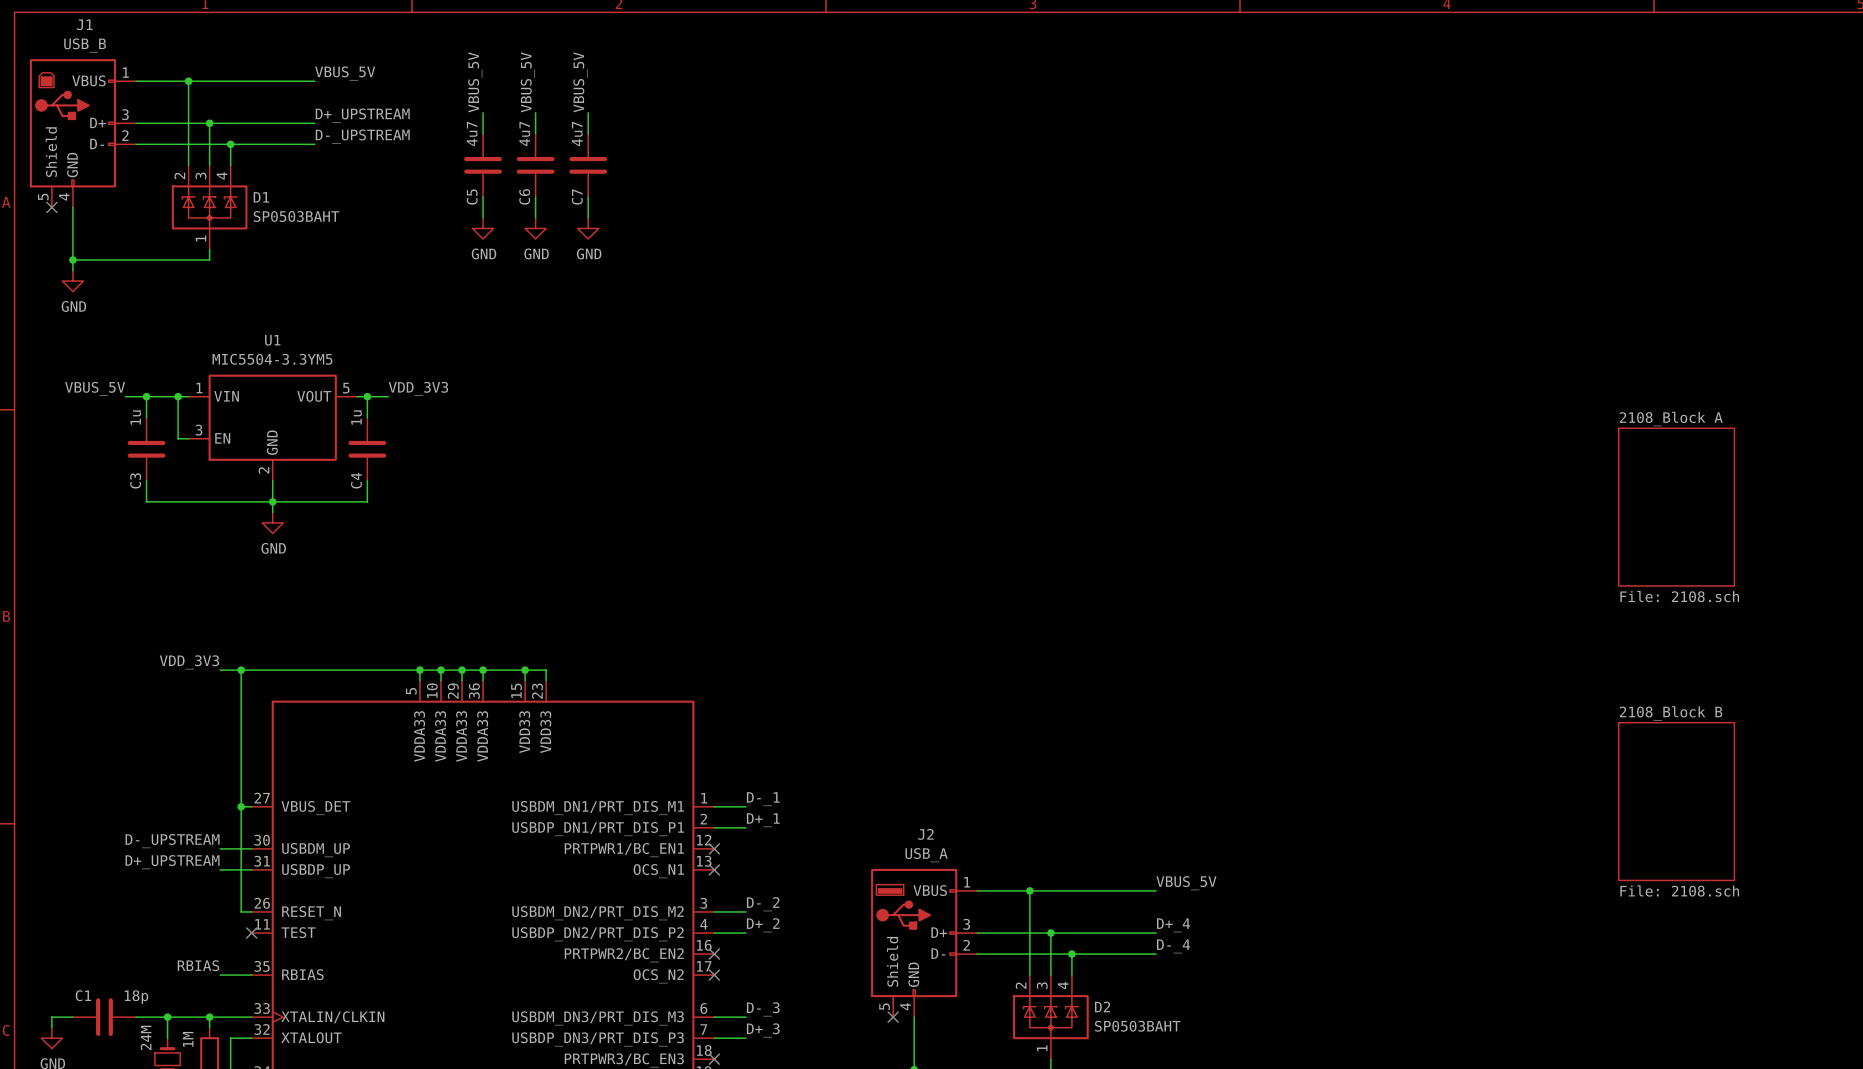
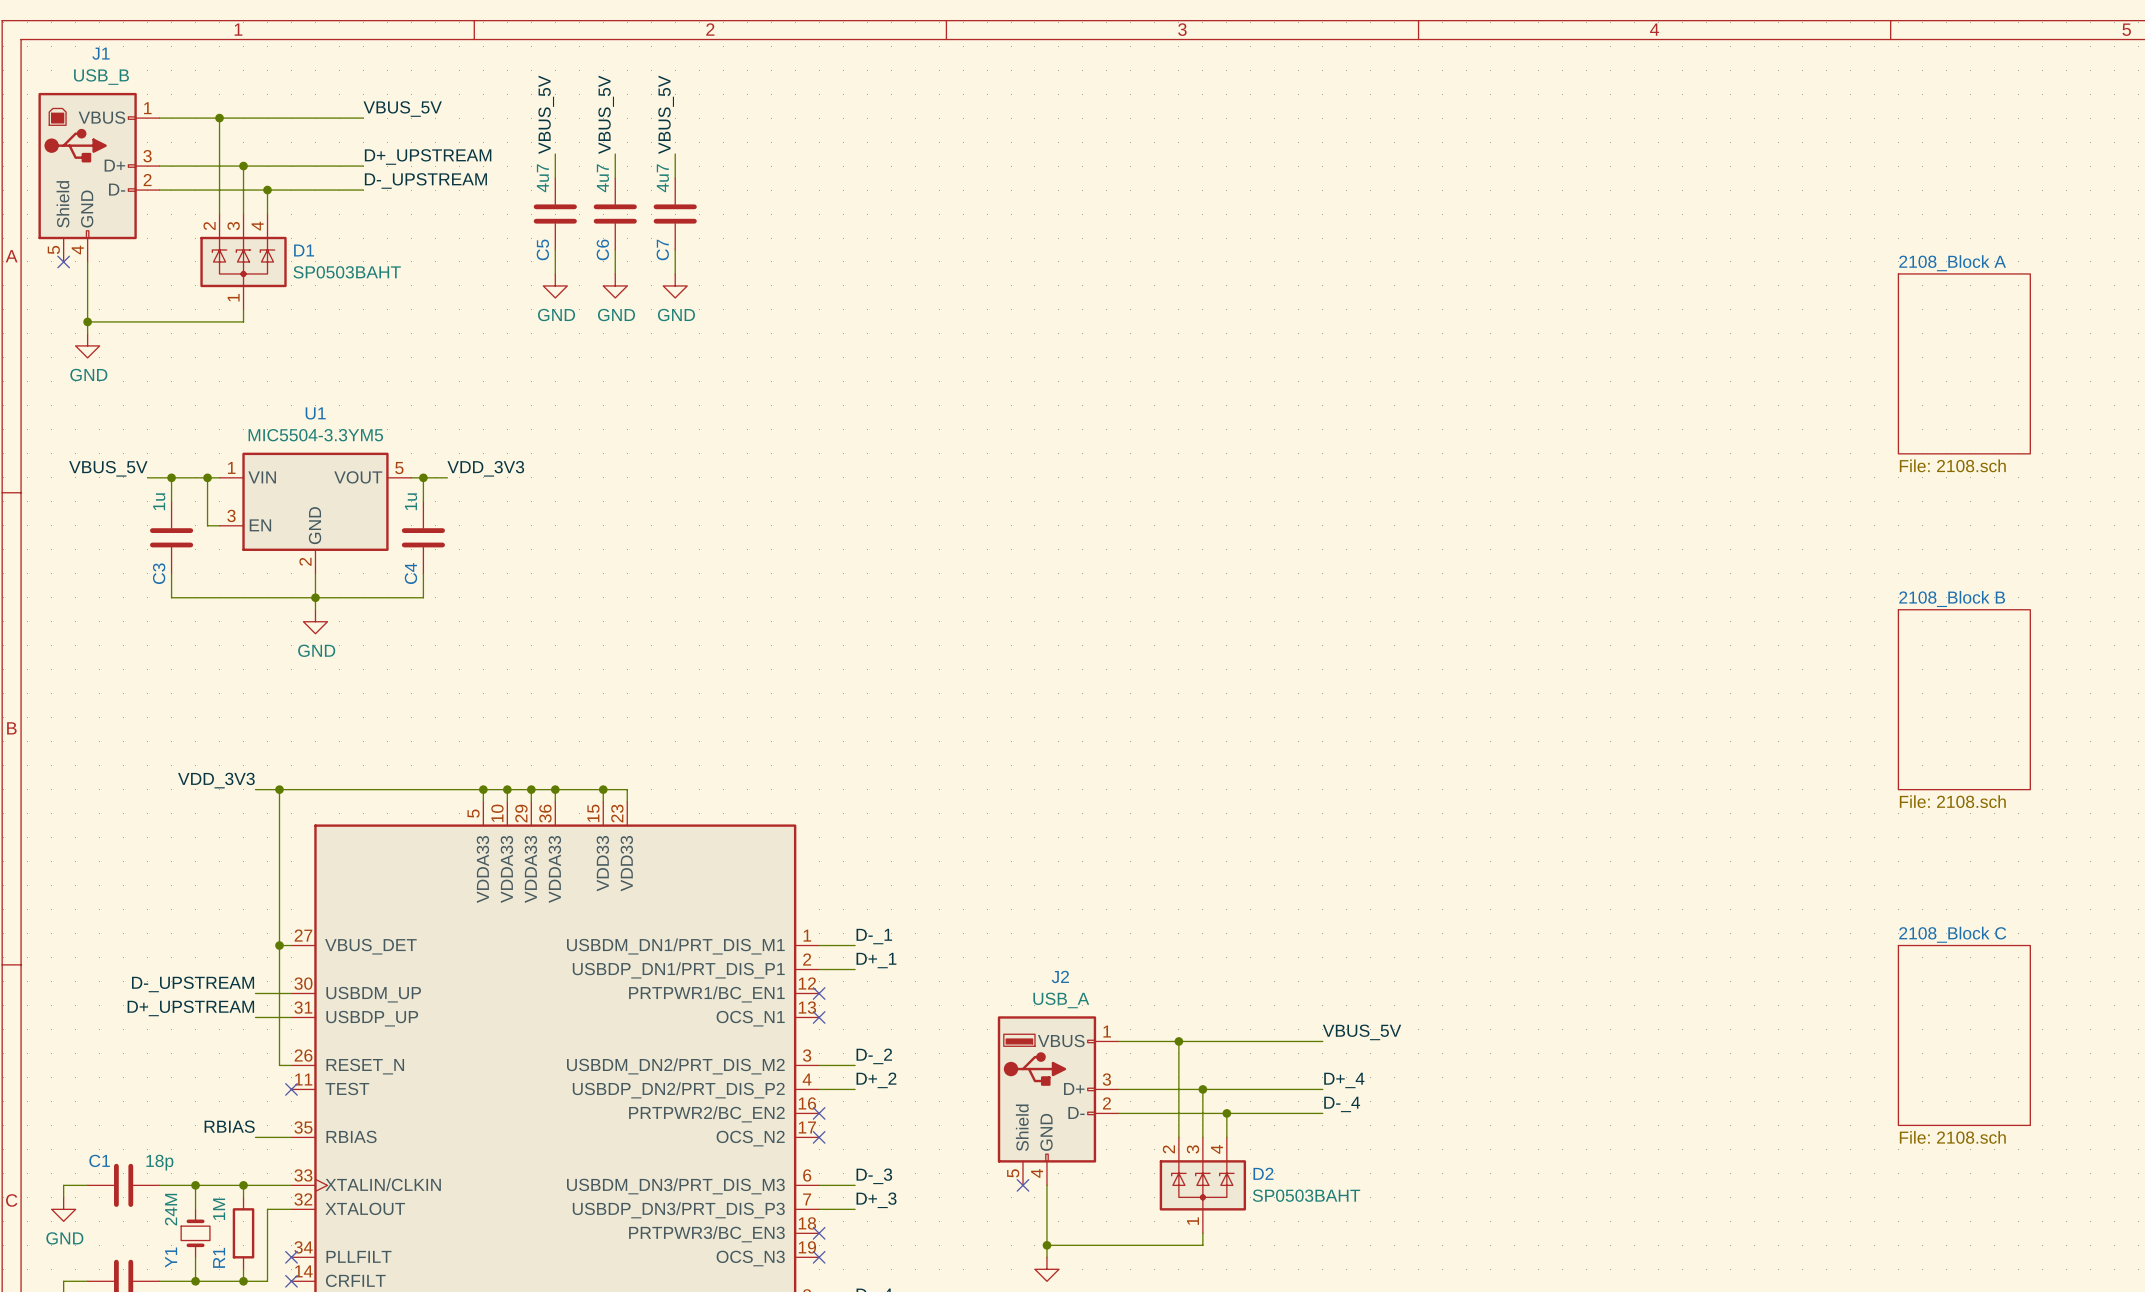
sheet 2108_Block A position: (1676, 507) -> (1964, 363)
sheet 2108_Block B position: (1676, 801) -> (1964, 699)
sheet 2108_Block C: none -> File: 2108.sch (1964, 1035)

